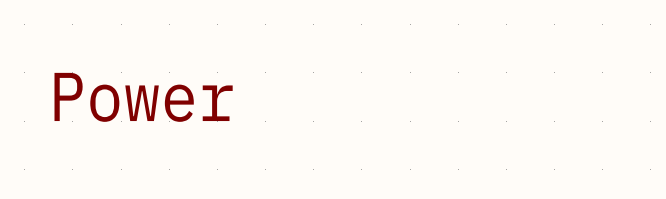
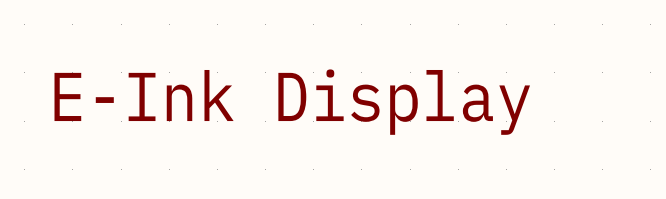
text: Power (143, 97) -> E-Ink Display (292, 102)

